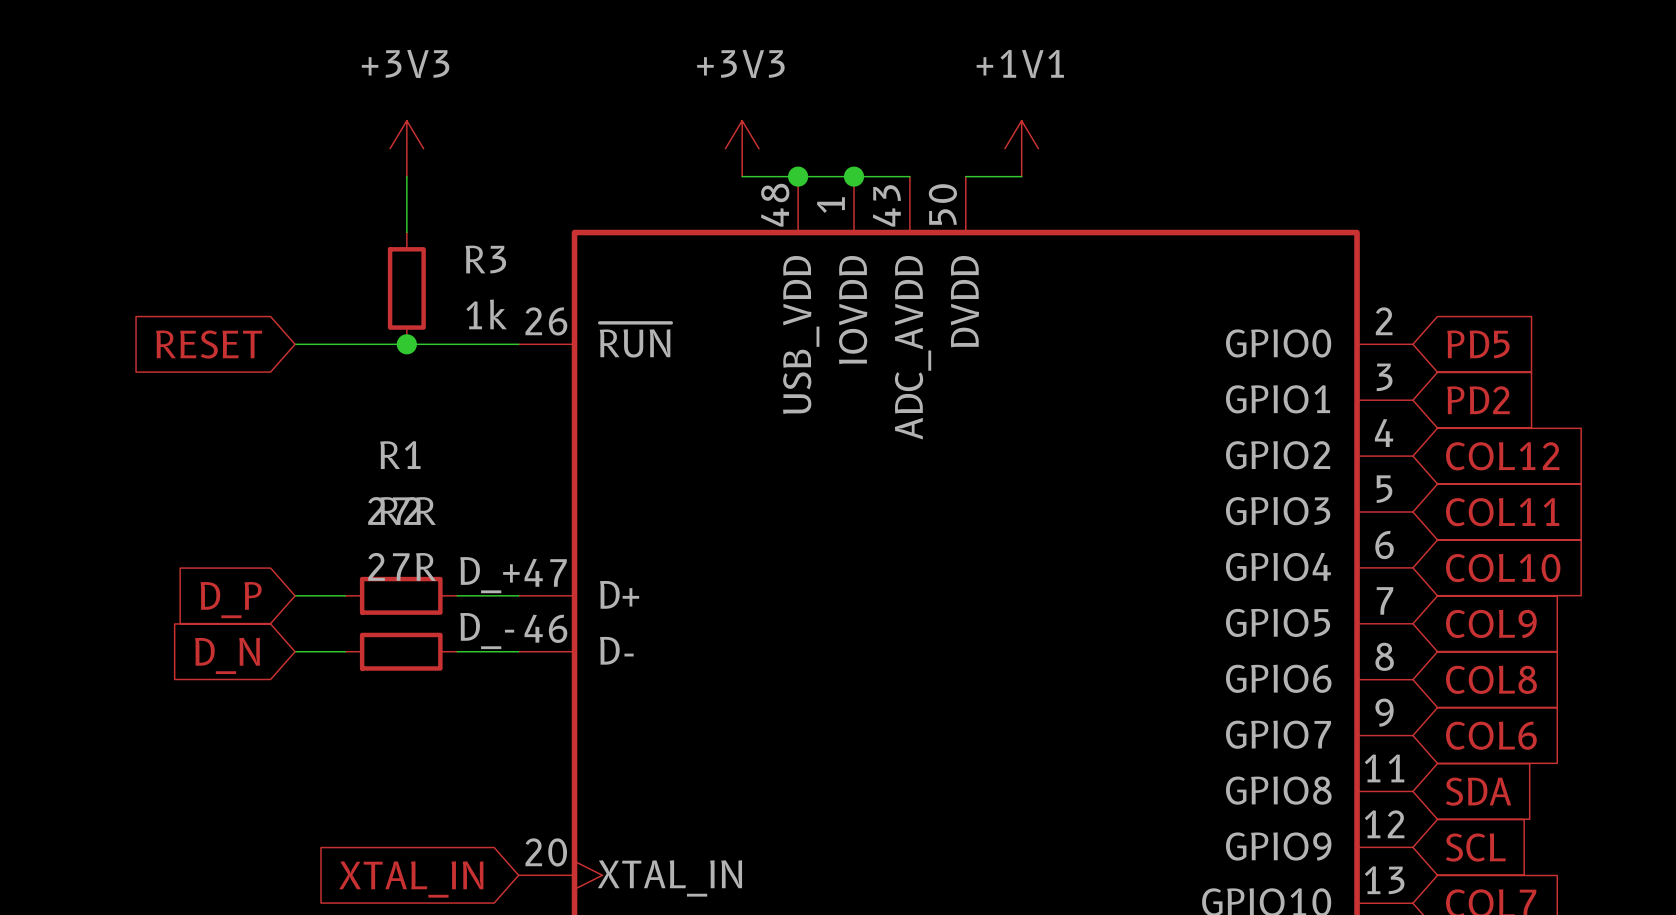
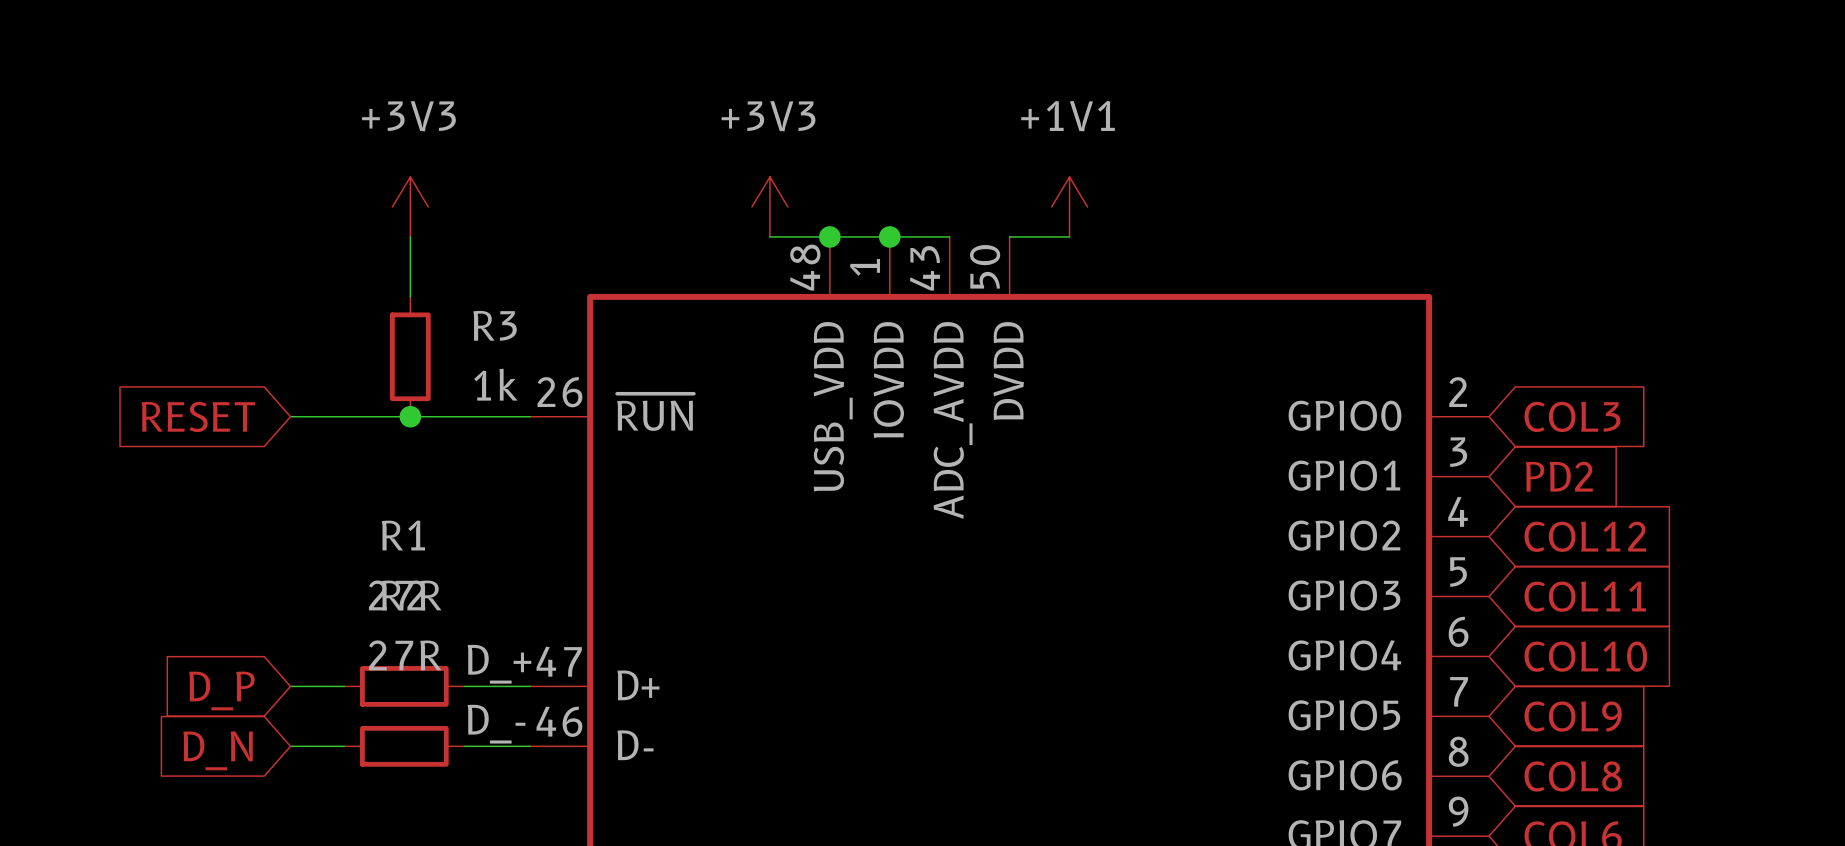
global label: PD5 (1478, 344) -> COL3 (1572, 416)

